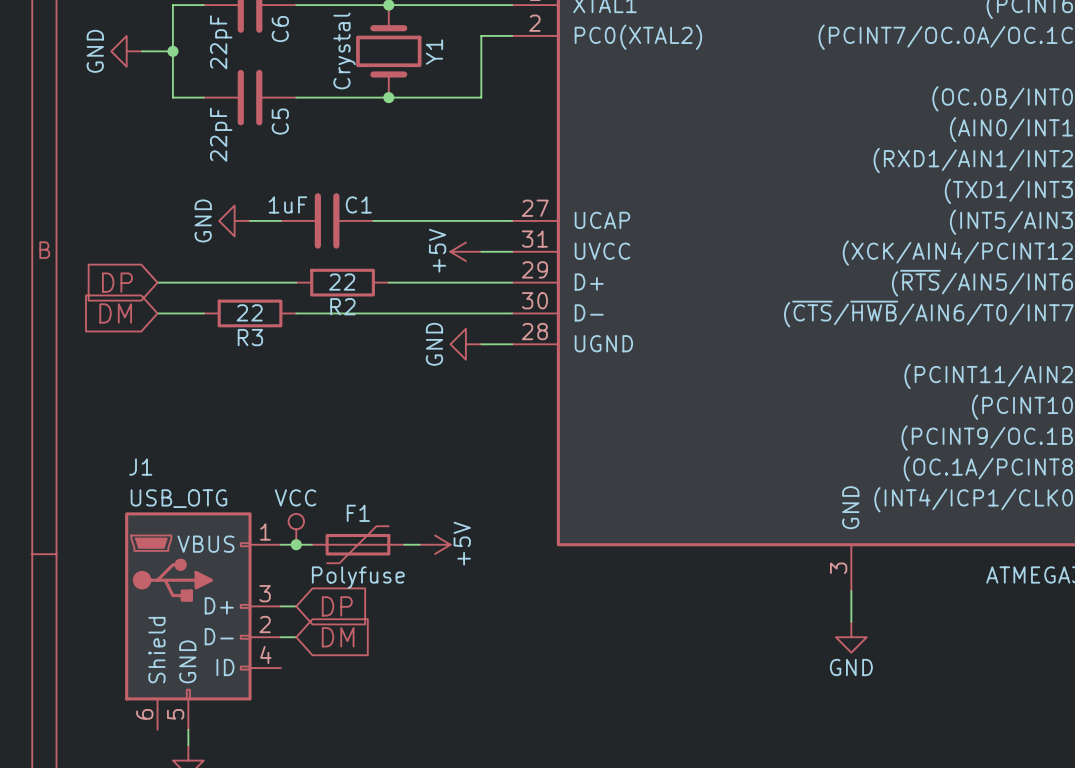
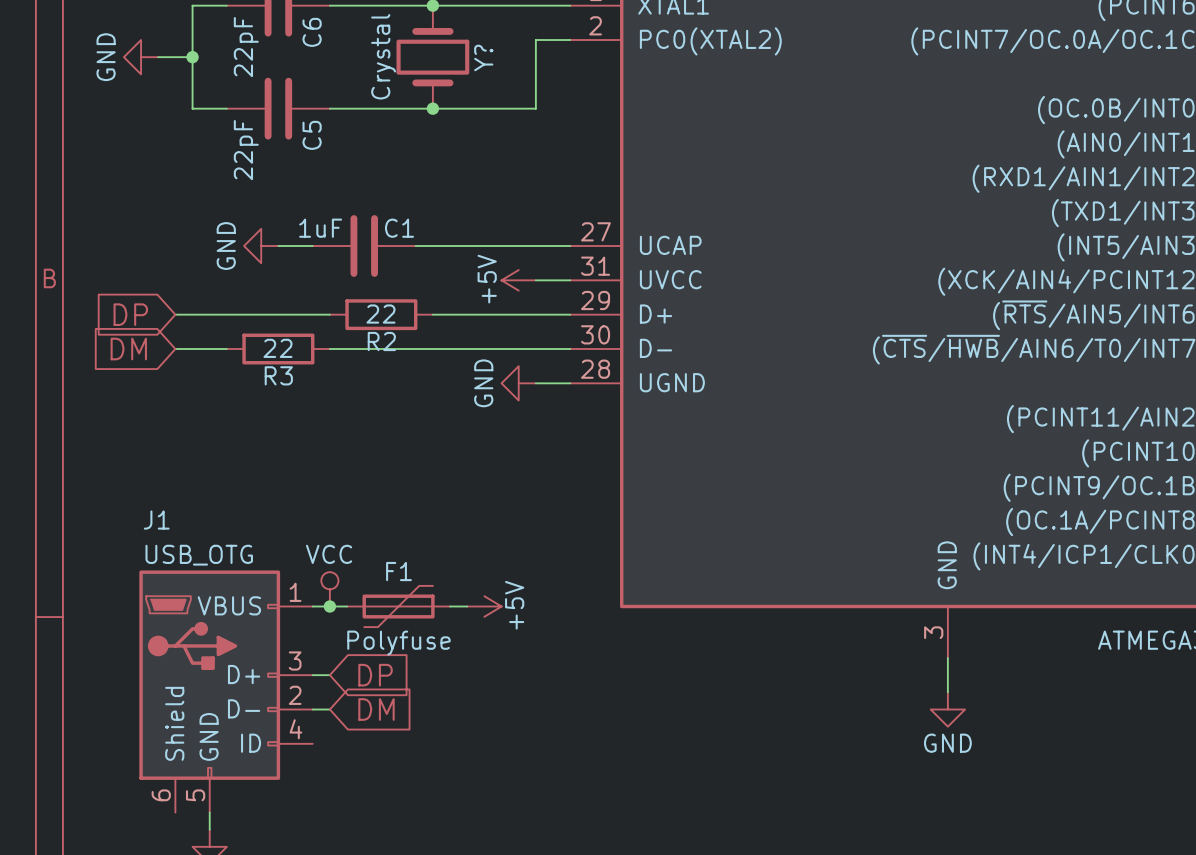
Y1 name: Y1 (434, 52) -> Y? (483, 57)

